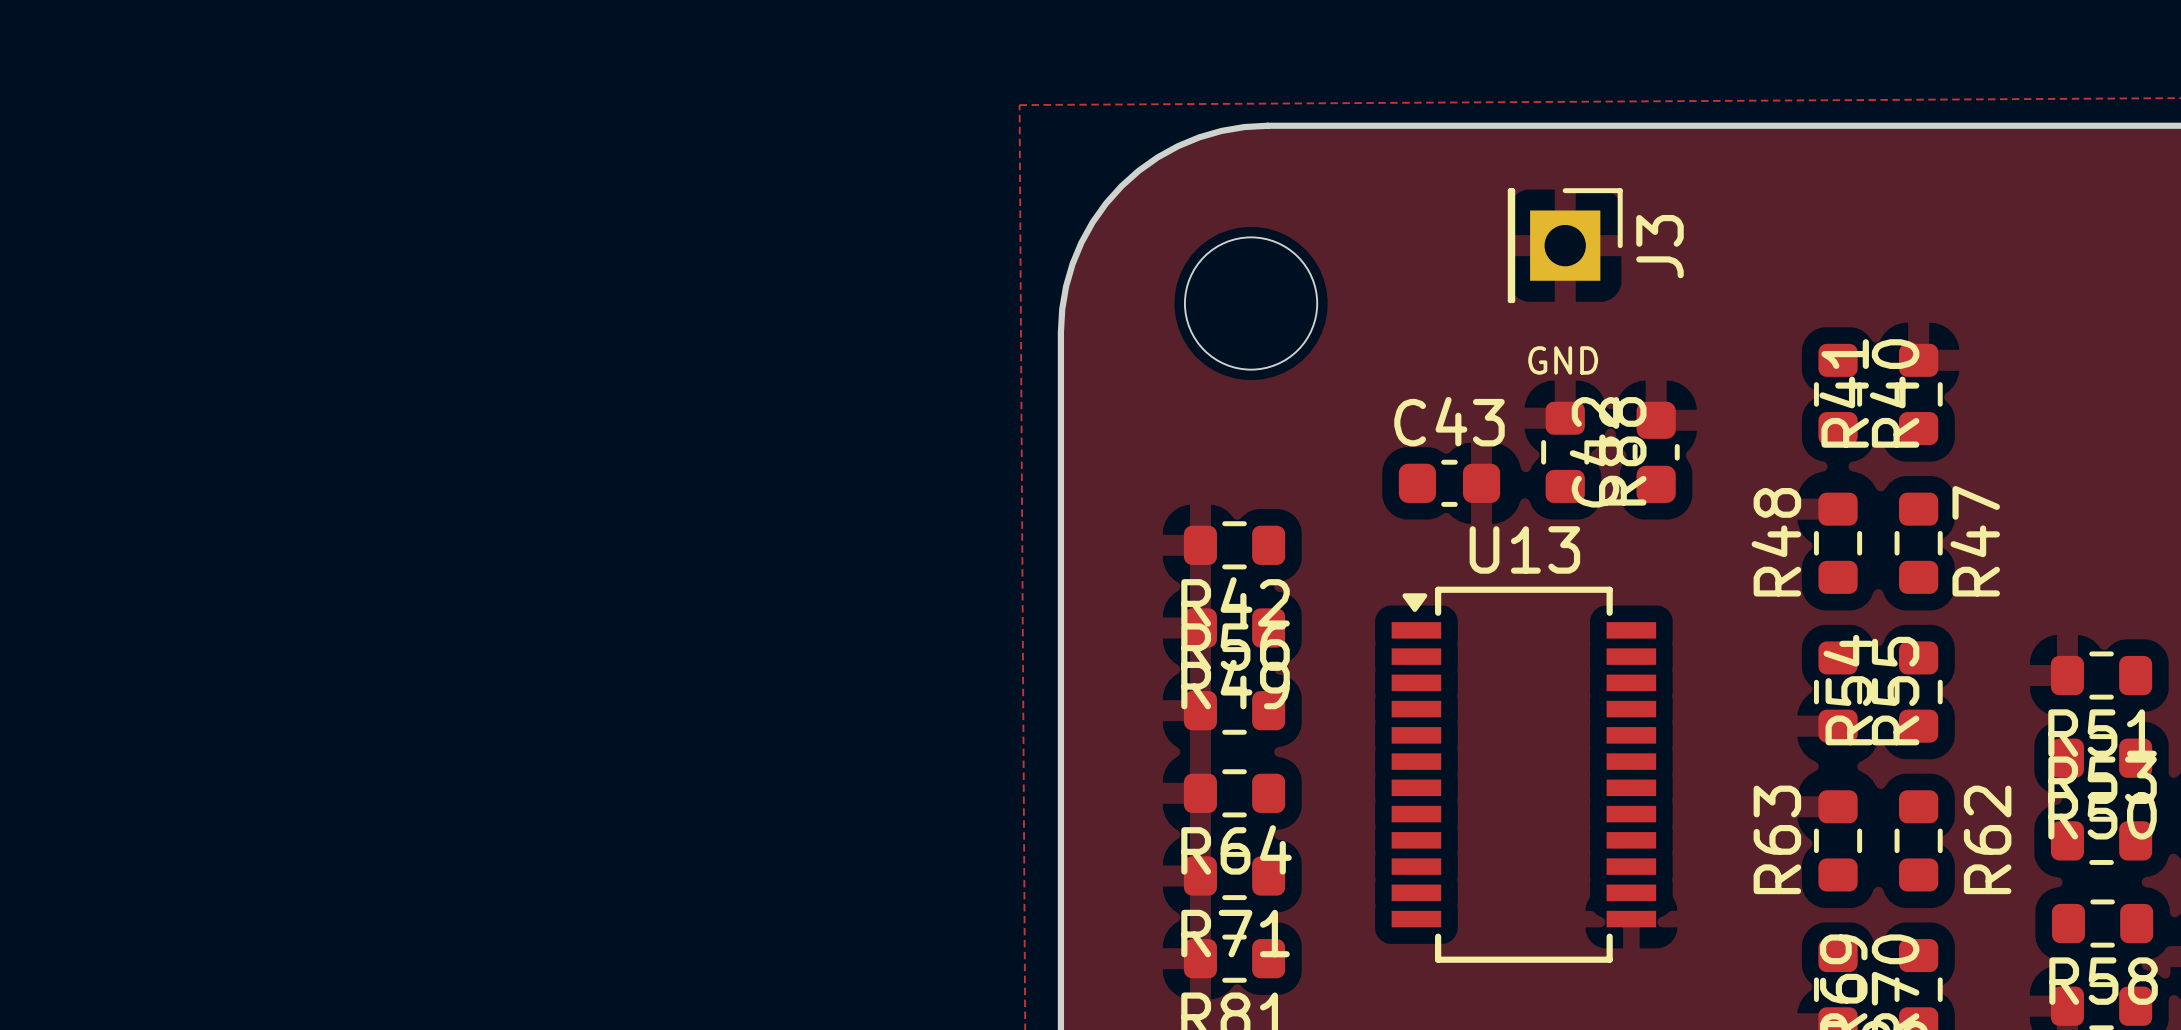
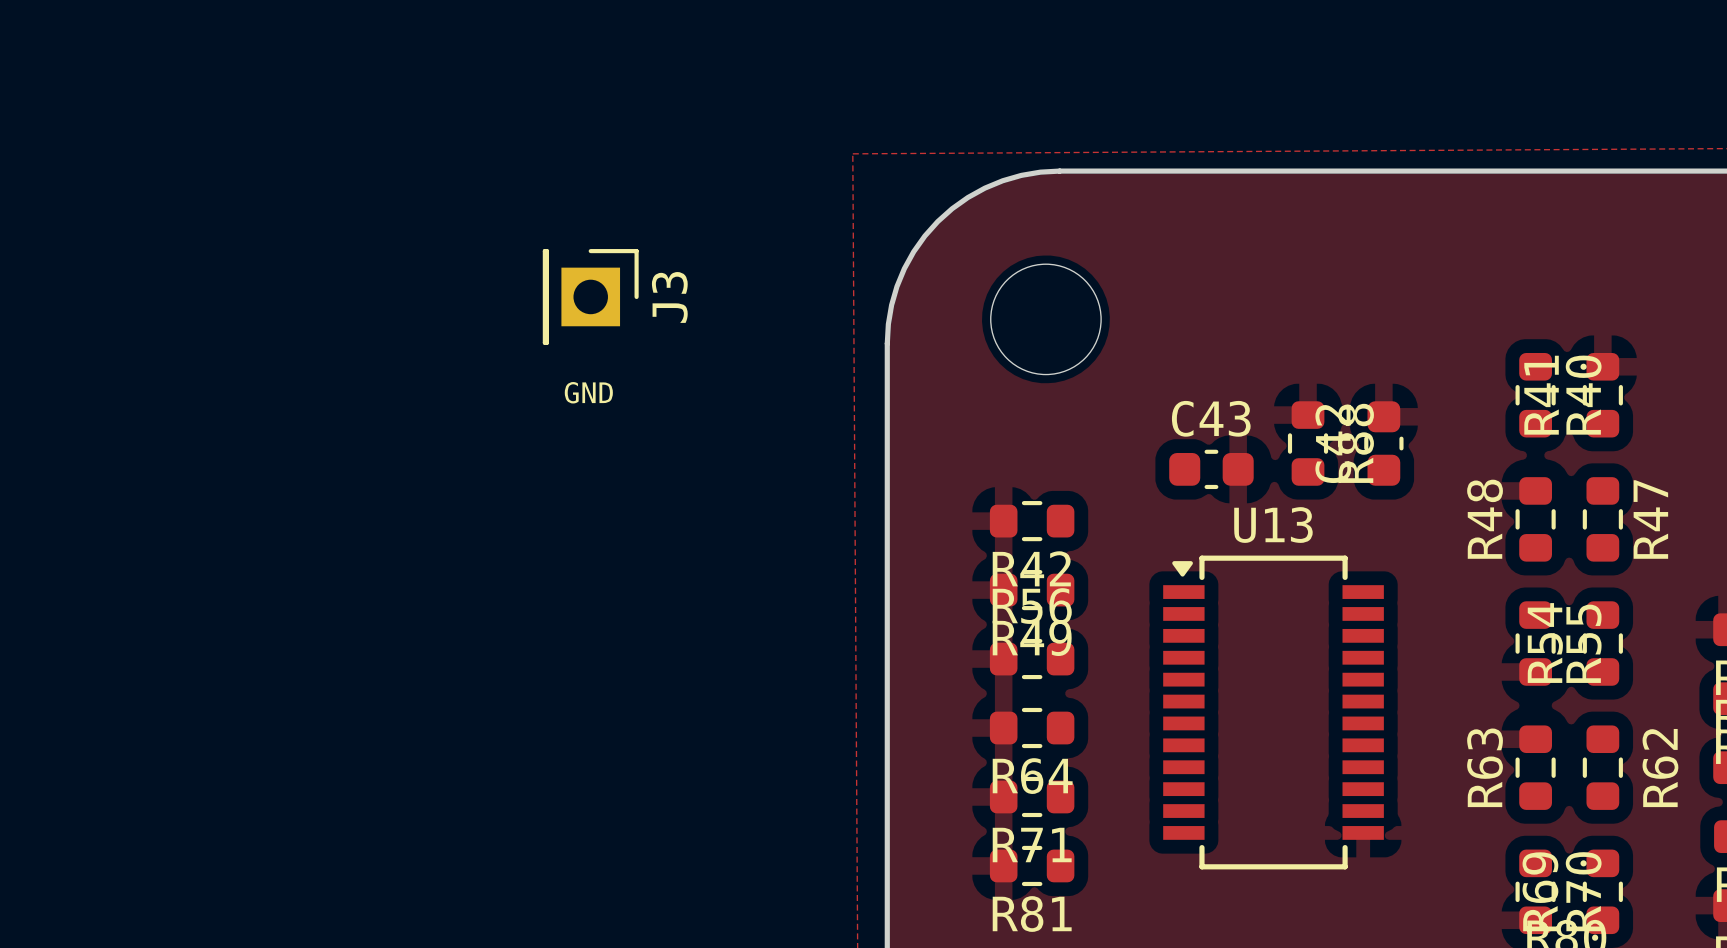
J3 position: (1565, 245) -> (590, 296)
text position: GND (1563, 360) -> GND (588, 392)

